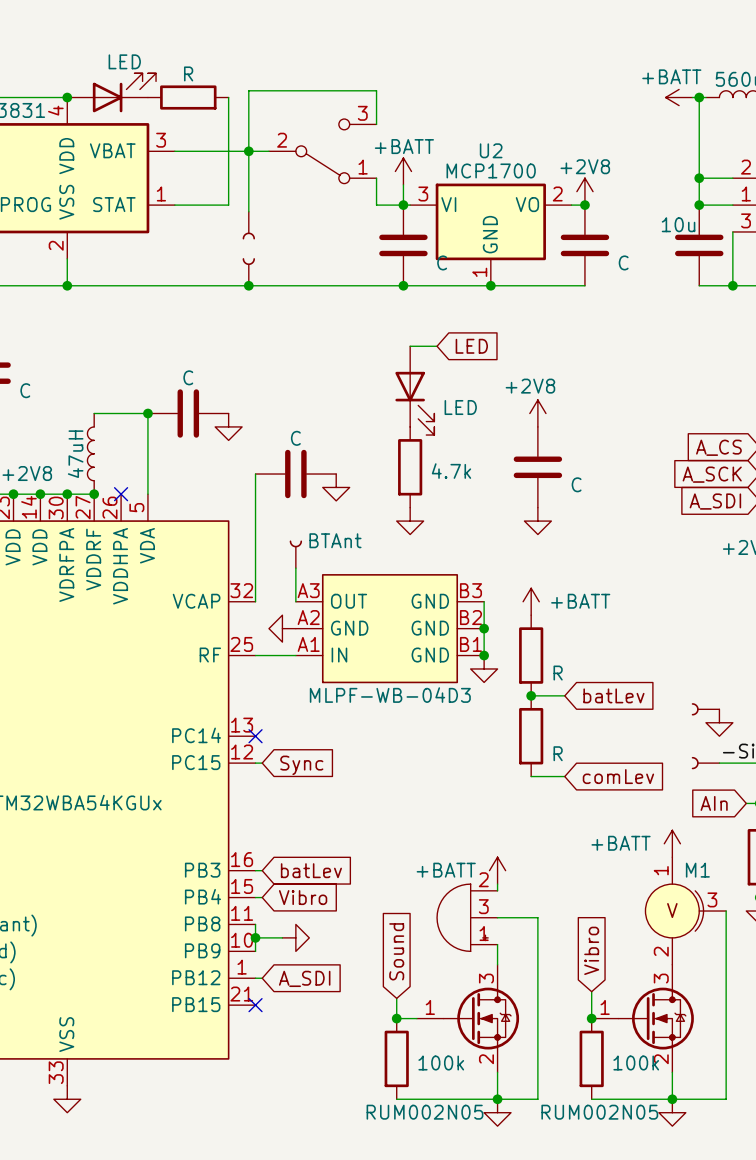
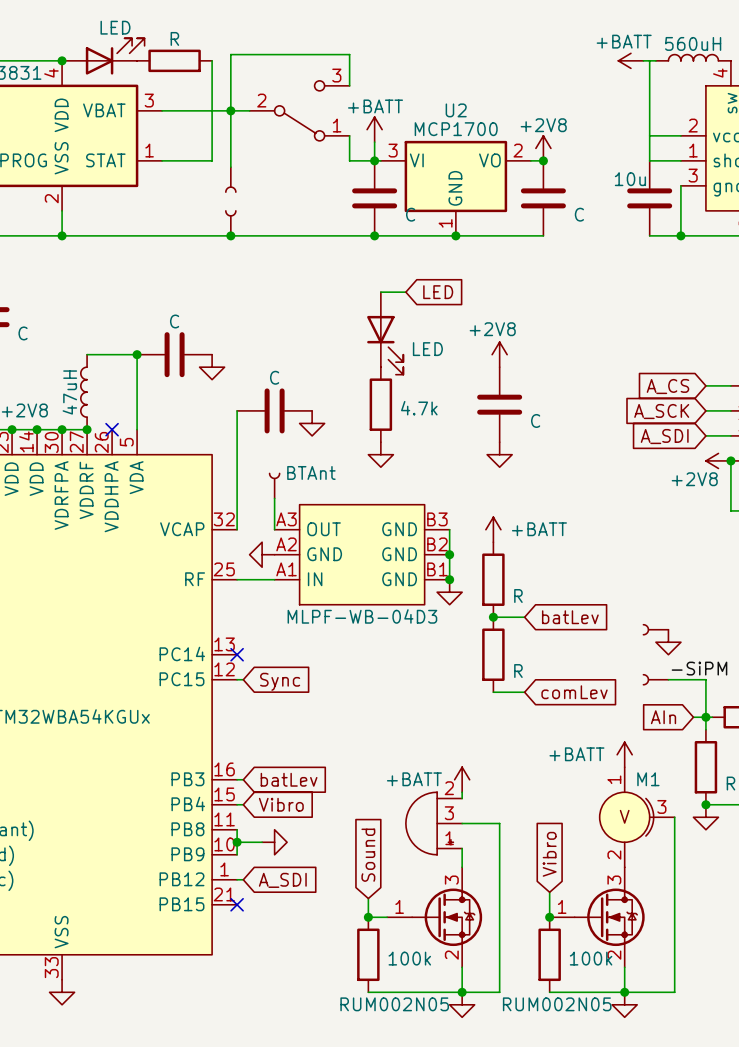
junction: (699, 97) -> none
junction: (699, 178) -> none
junction: (699, 205) -> none

